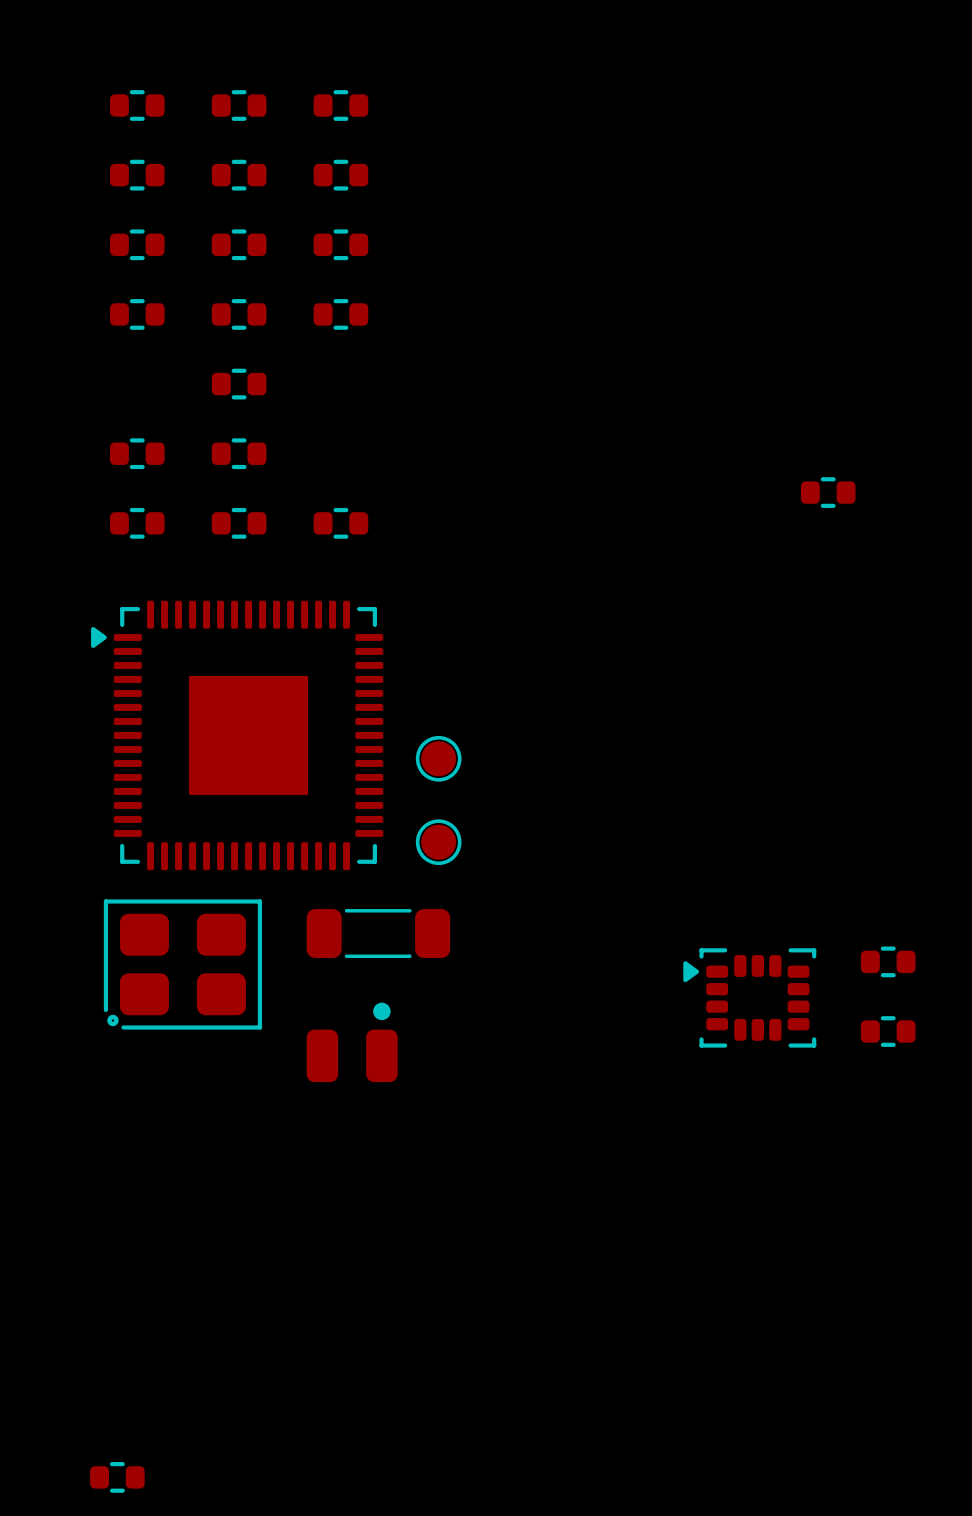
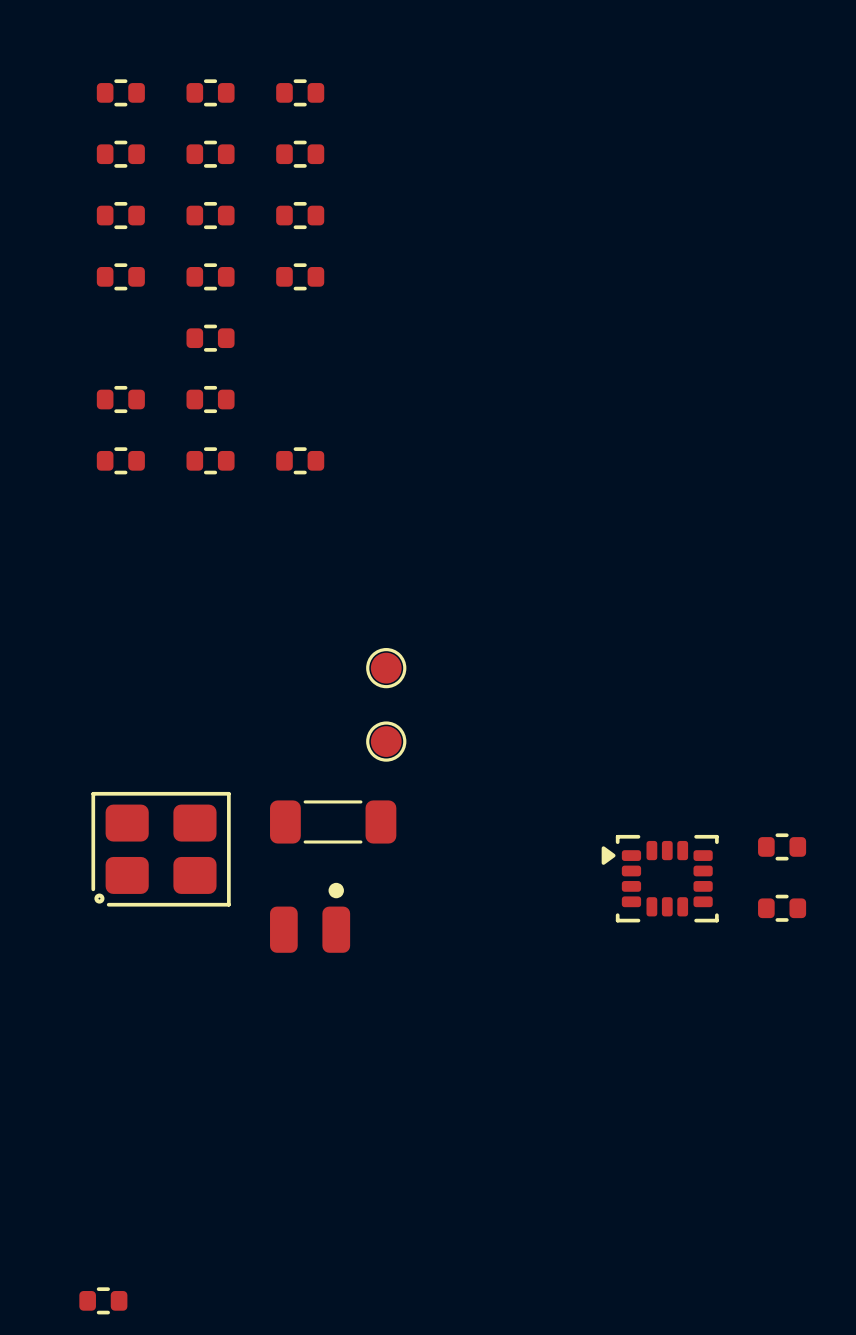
part: (828, 492) -> none
part: (237, 735) -> none

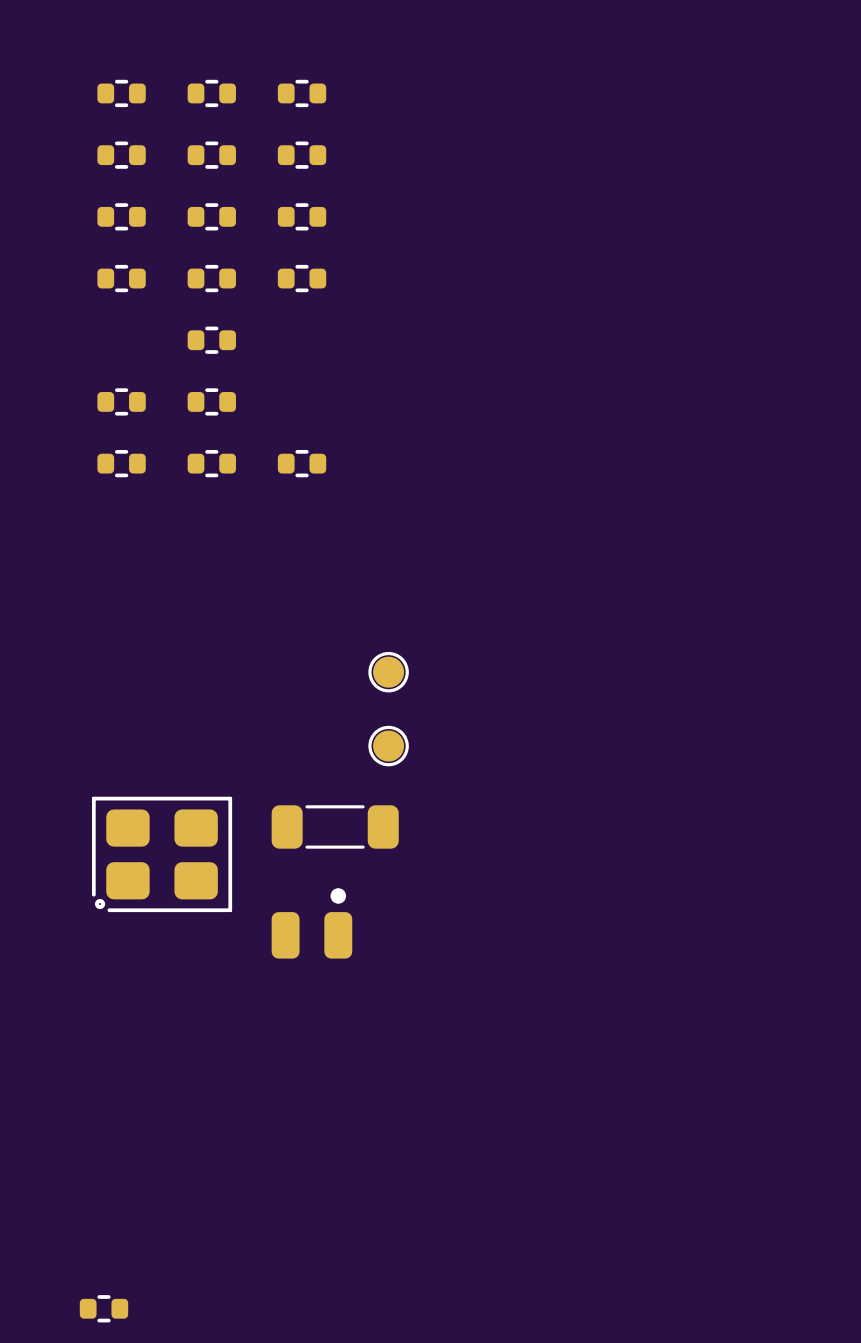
part: (782, 846) -> none
part: (660, 878) -> none
part: (782, 908) -> none

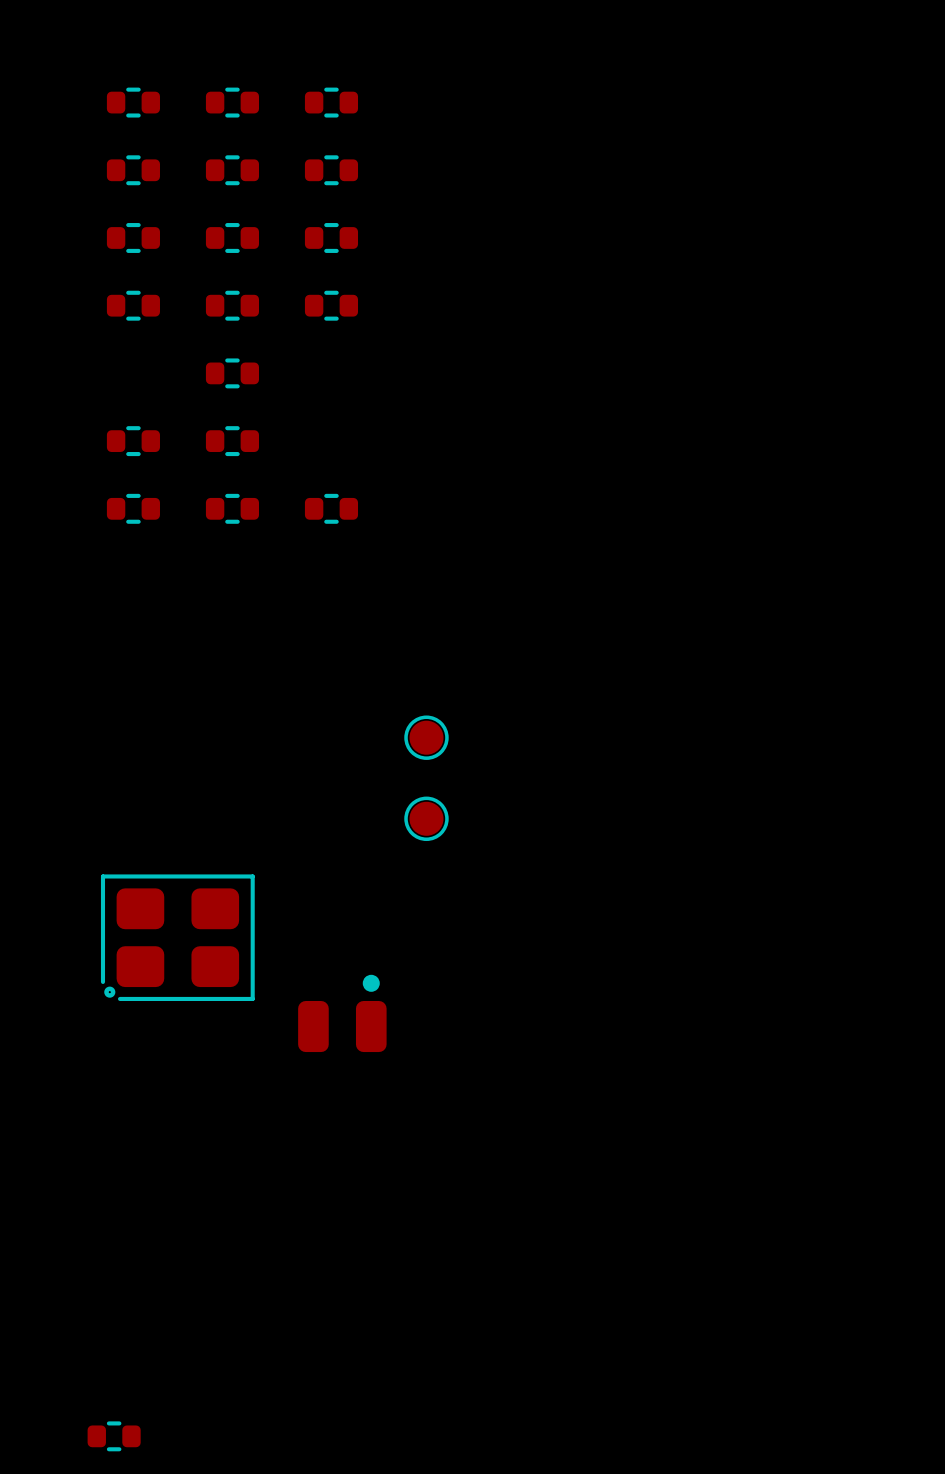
part: (335, 826) -> none

